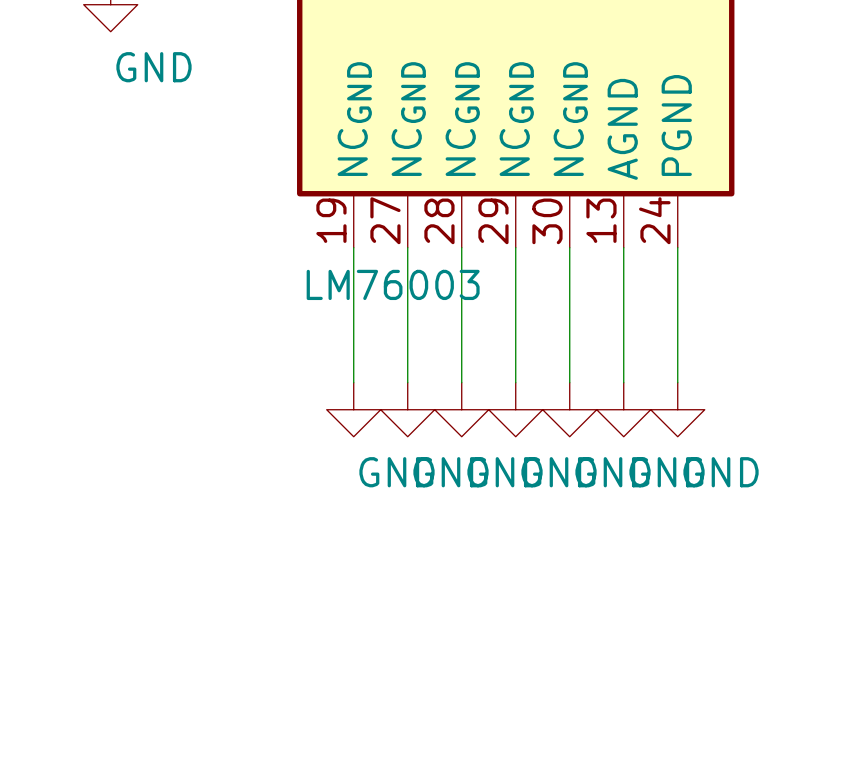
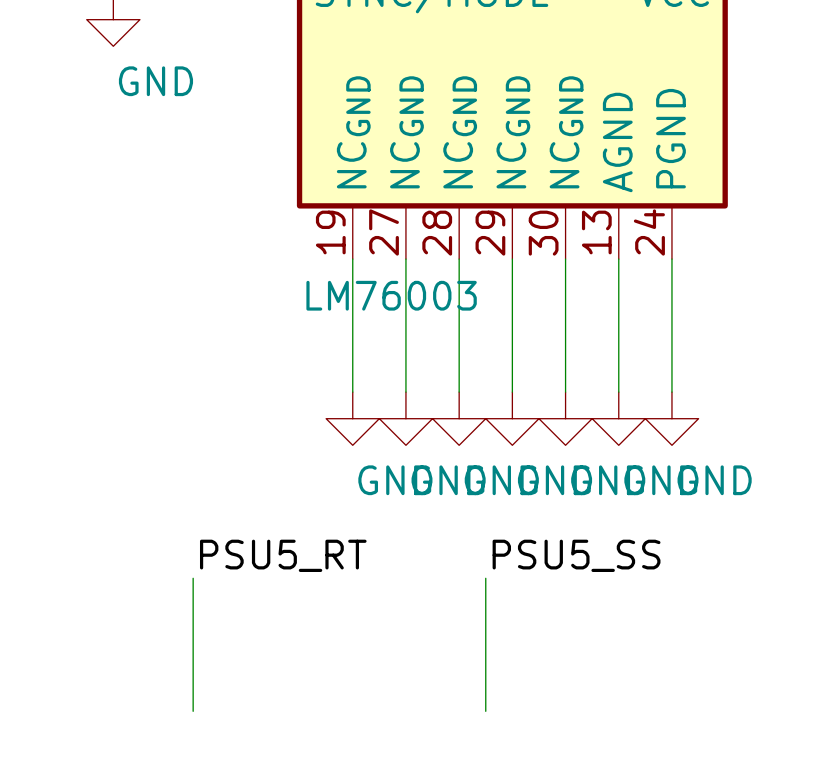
label: none -> PSU5_RT (283, 555)
label: none -> PSU5_SS (576, 555)
wire: none -> (193, 578) (193, 711)
wire: none -> (485, 578) (485, 711)

